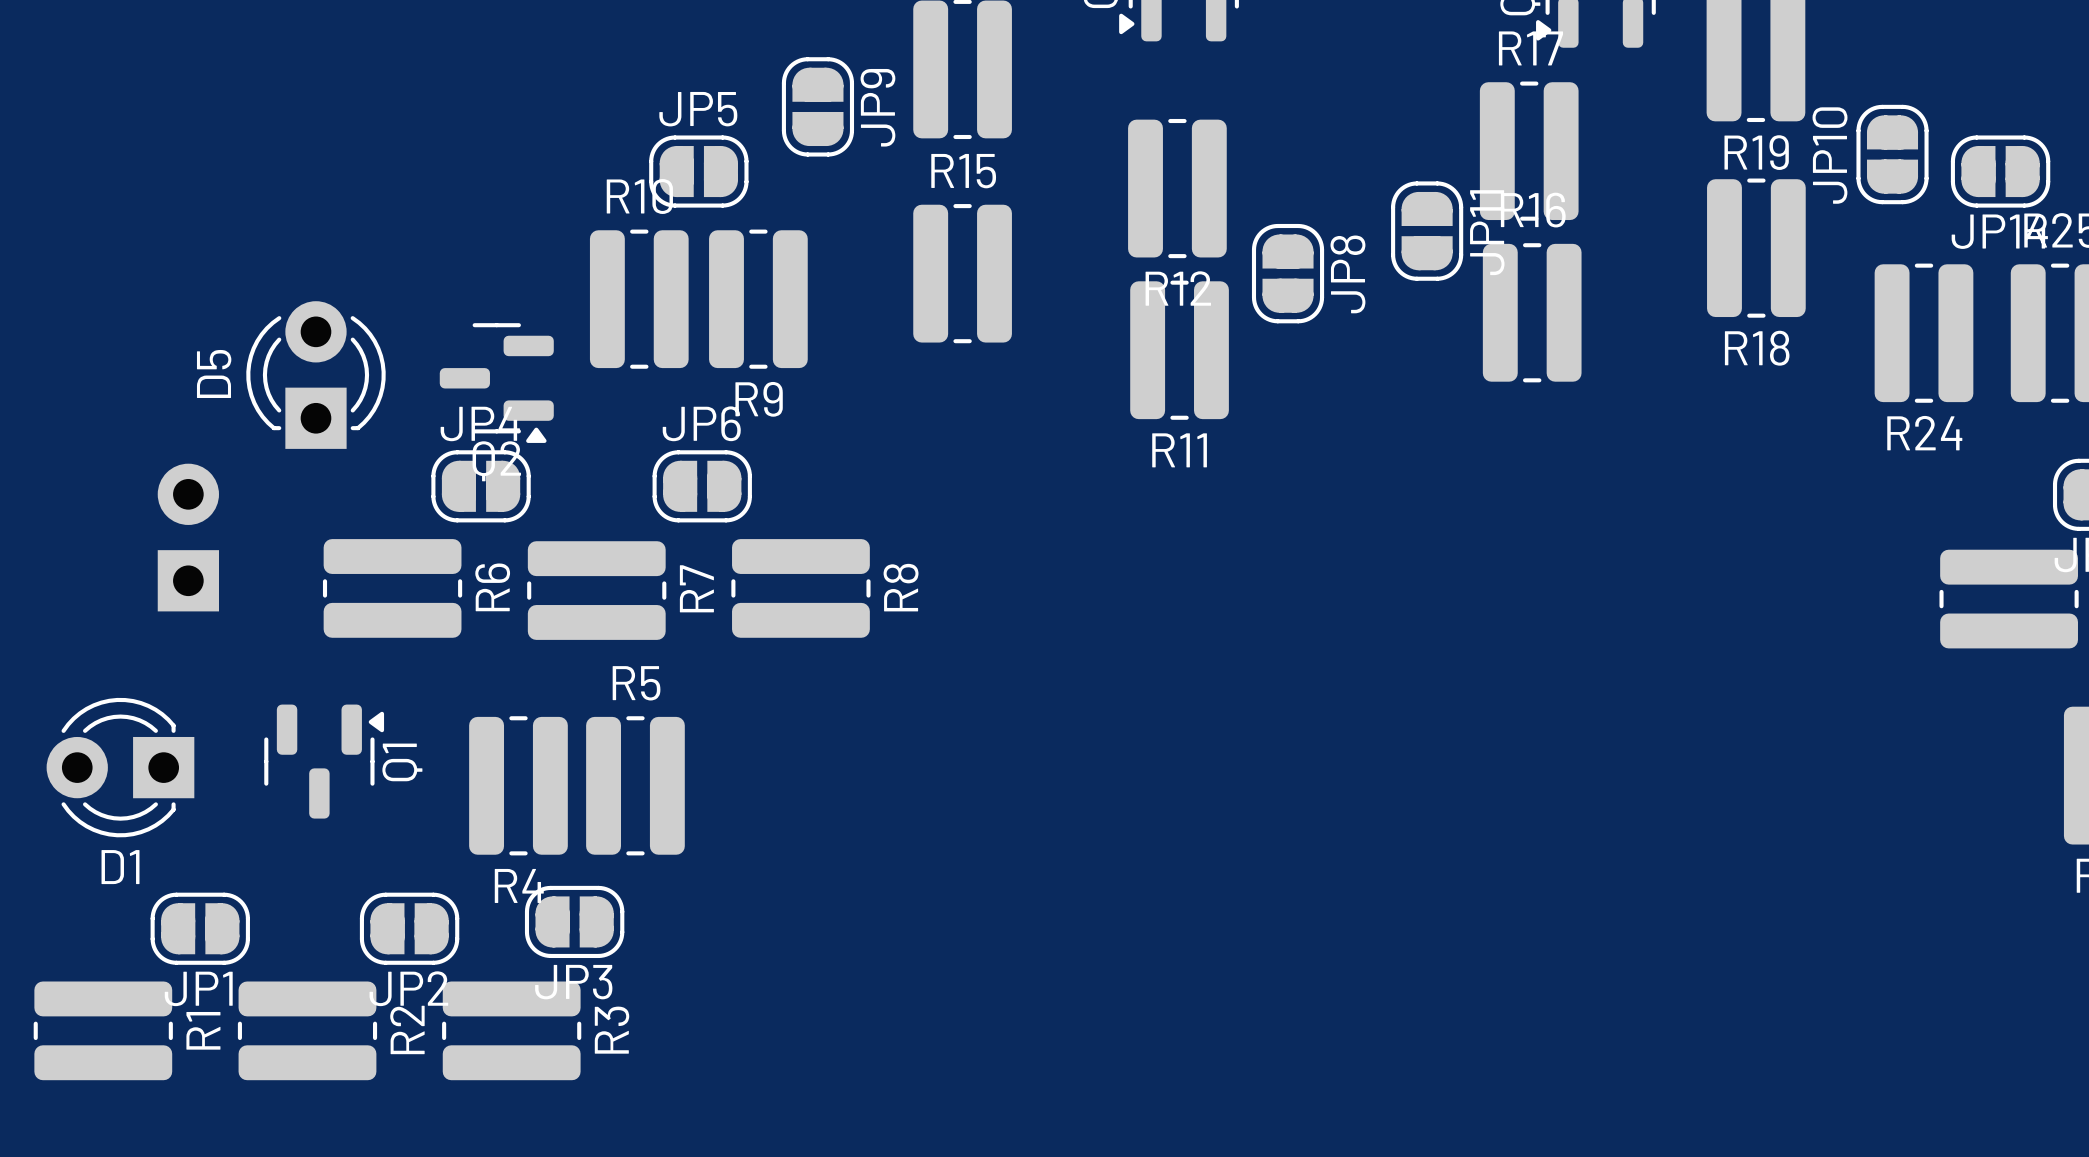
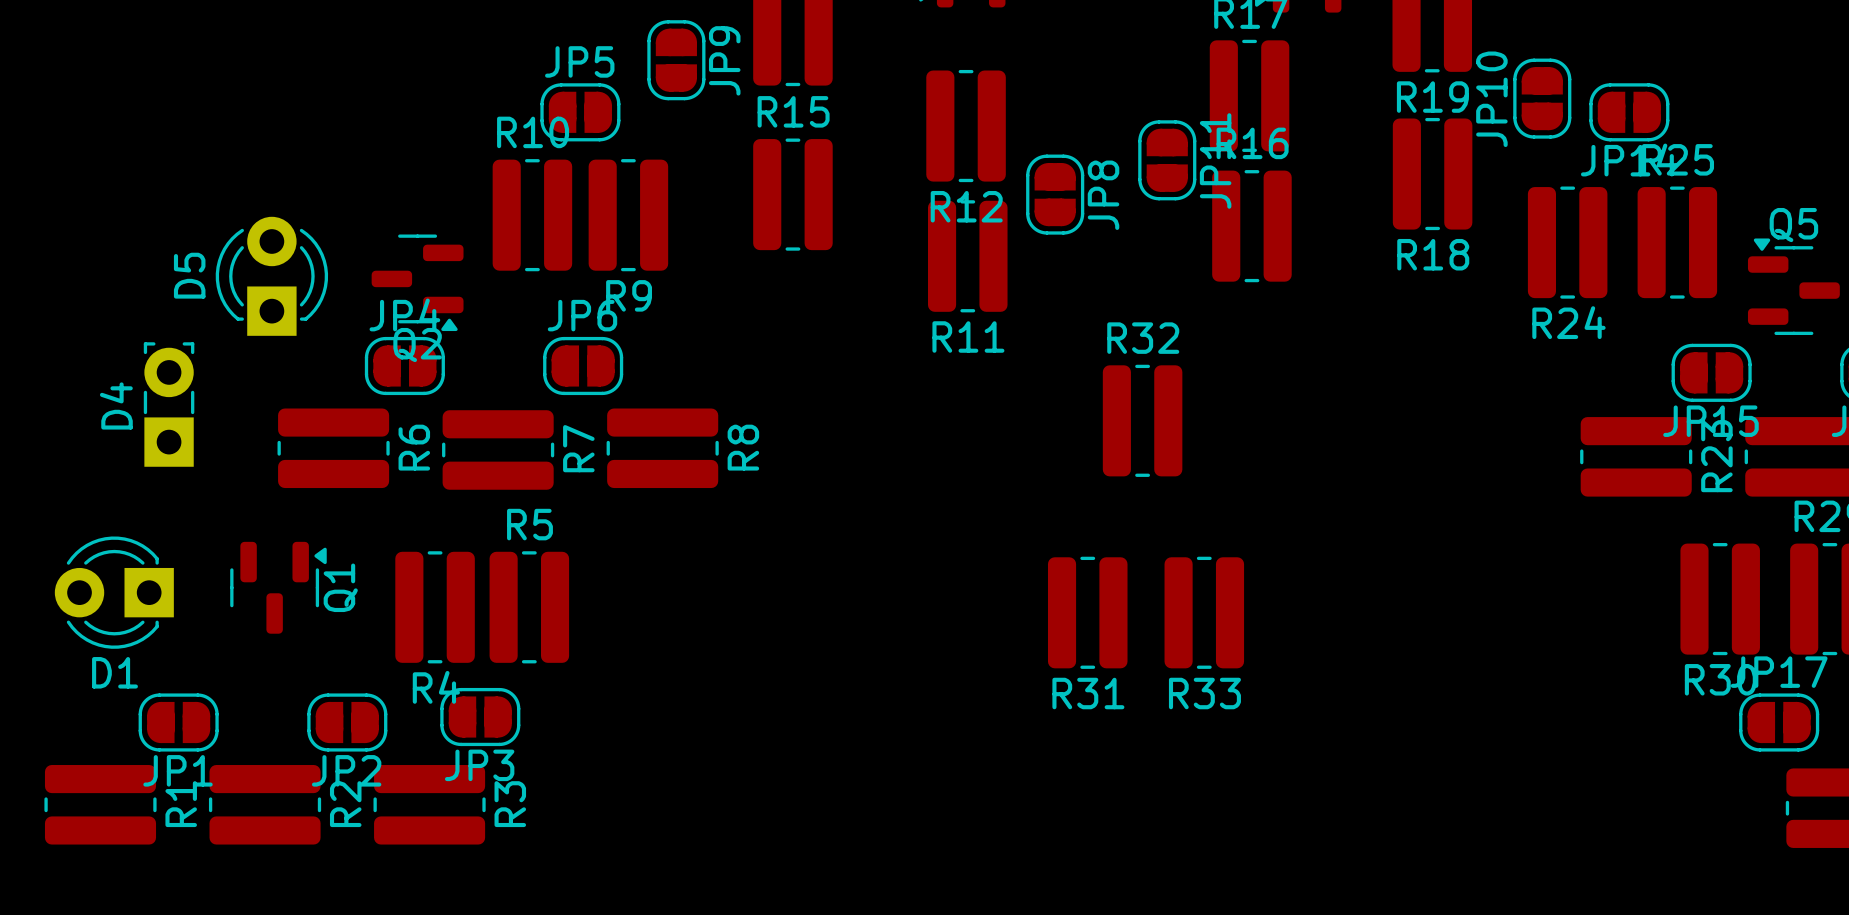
D4 side: bottom (188, 537) -> top (169, 404)
R32: none -> (1142, 420)
R31: none -> (1087, 612)
R33: none -> (1204, 612)

